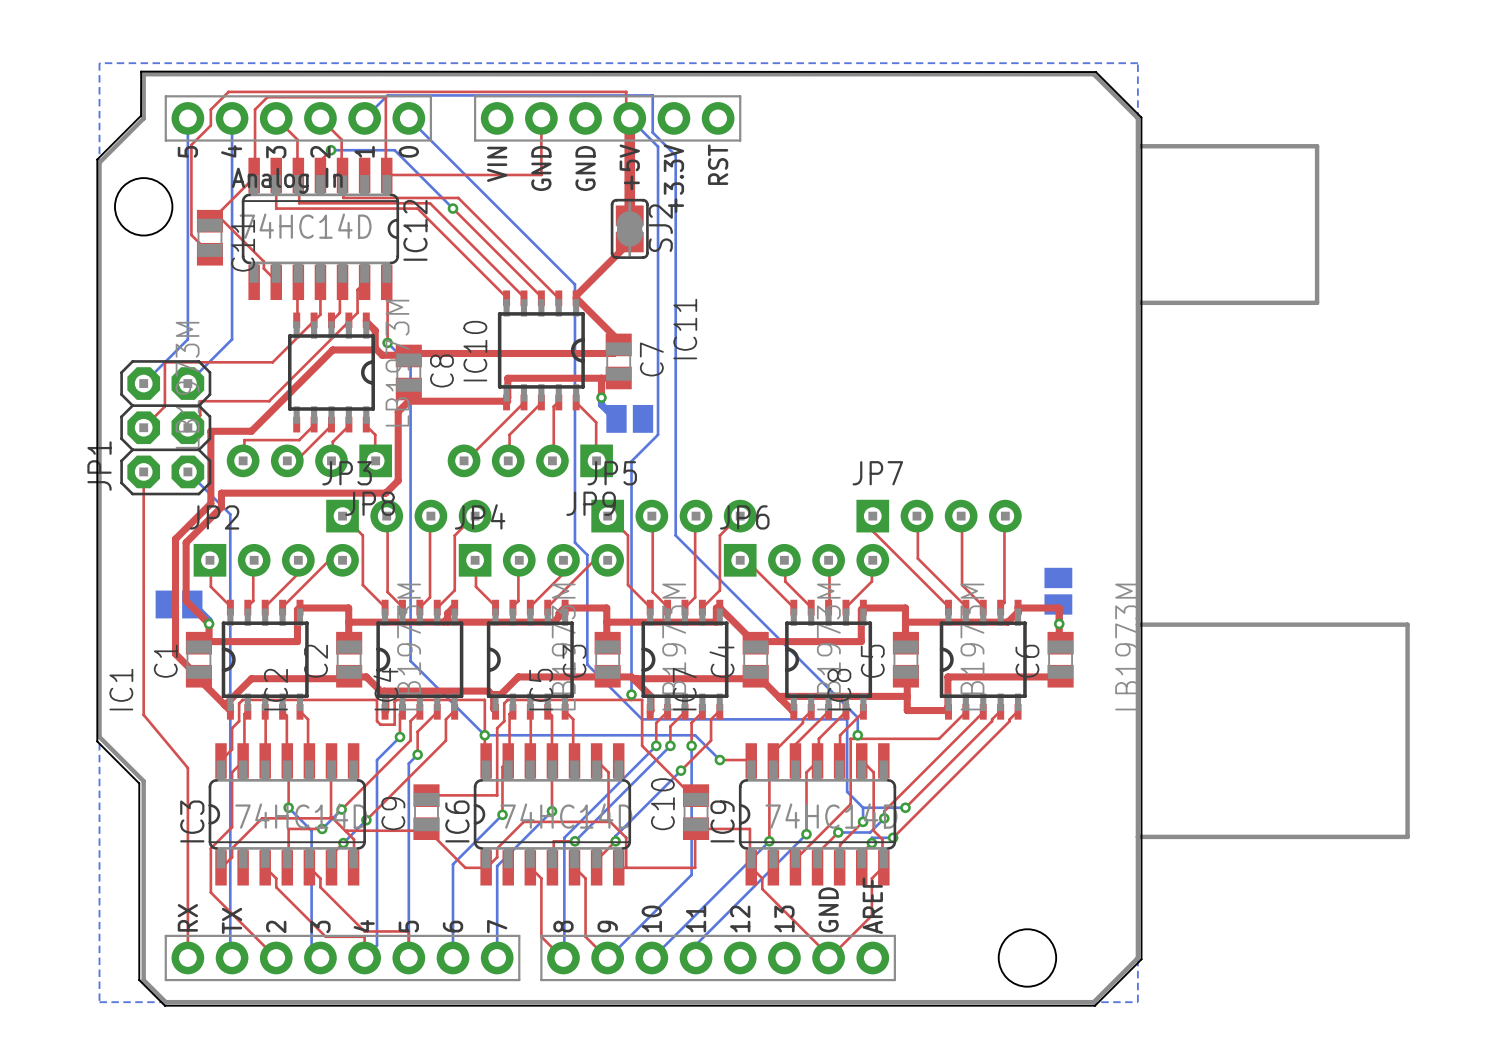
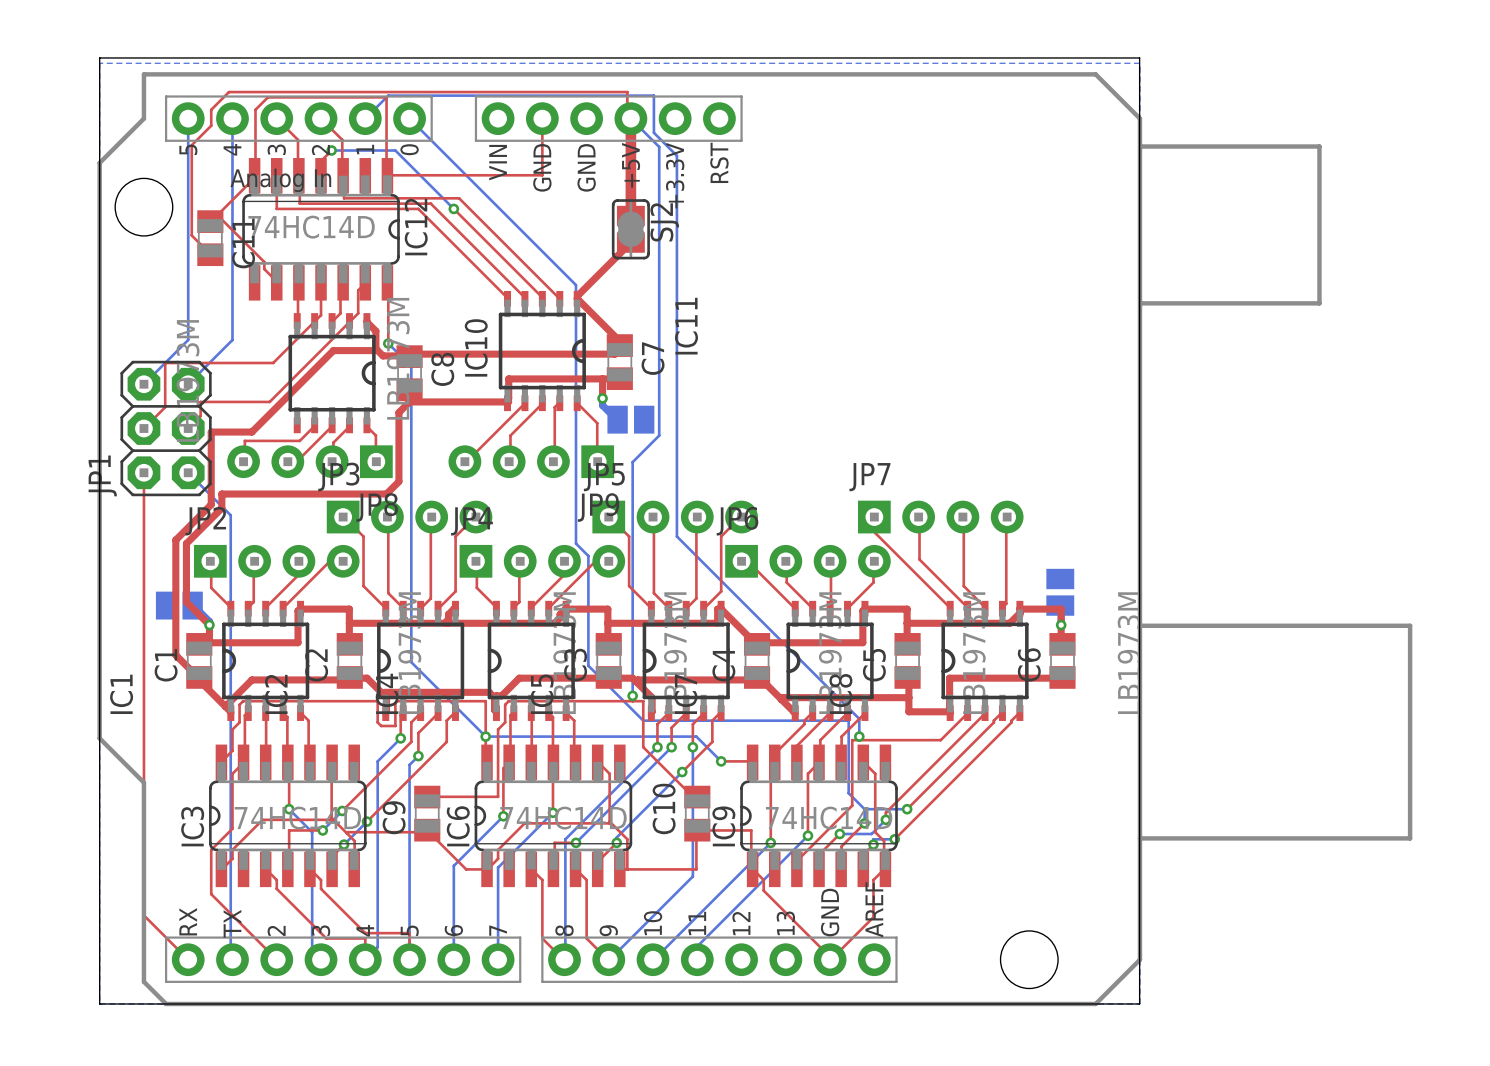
board edge: (141, 71) (1095, 72) (1141, 117) (1141, 959) (1095, 1005) (164, 1005) (139, 980) (139, 783) (97, 741) (97, 159) (141, 115) (141, 71) -> (99, 57) (99, 1003) (1139, 1003) (1139, 57) (99, 57)
top track: (143, 714) (187, 767) (187, 957) -> (143, 716) (143, 915) (188, 959)

